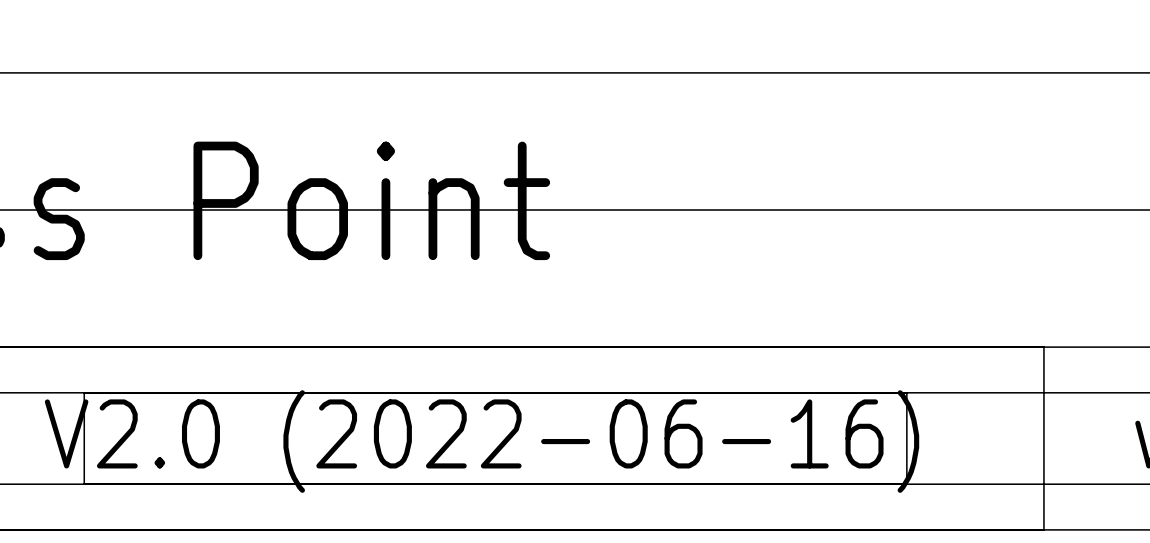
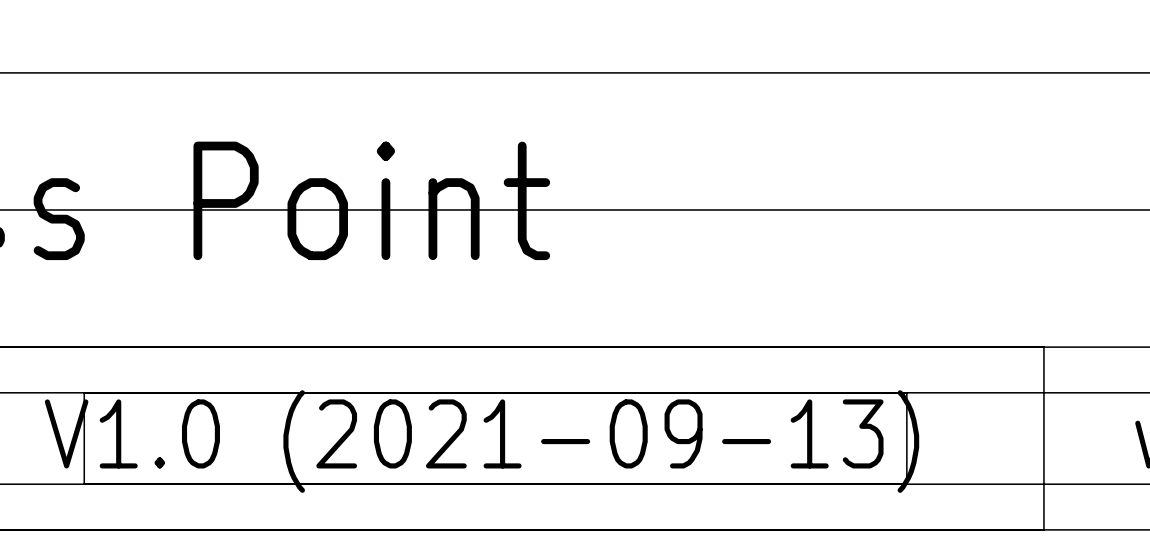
text: V2.0 (2022-06-16) (482, 441) -> V1.0 (2021-09-13) (482, 441)

